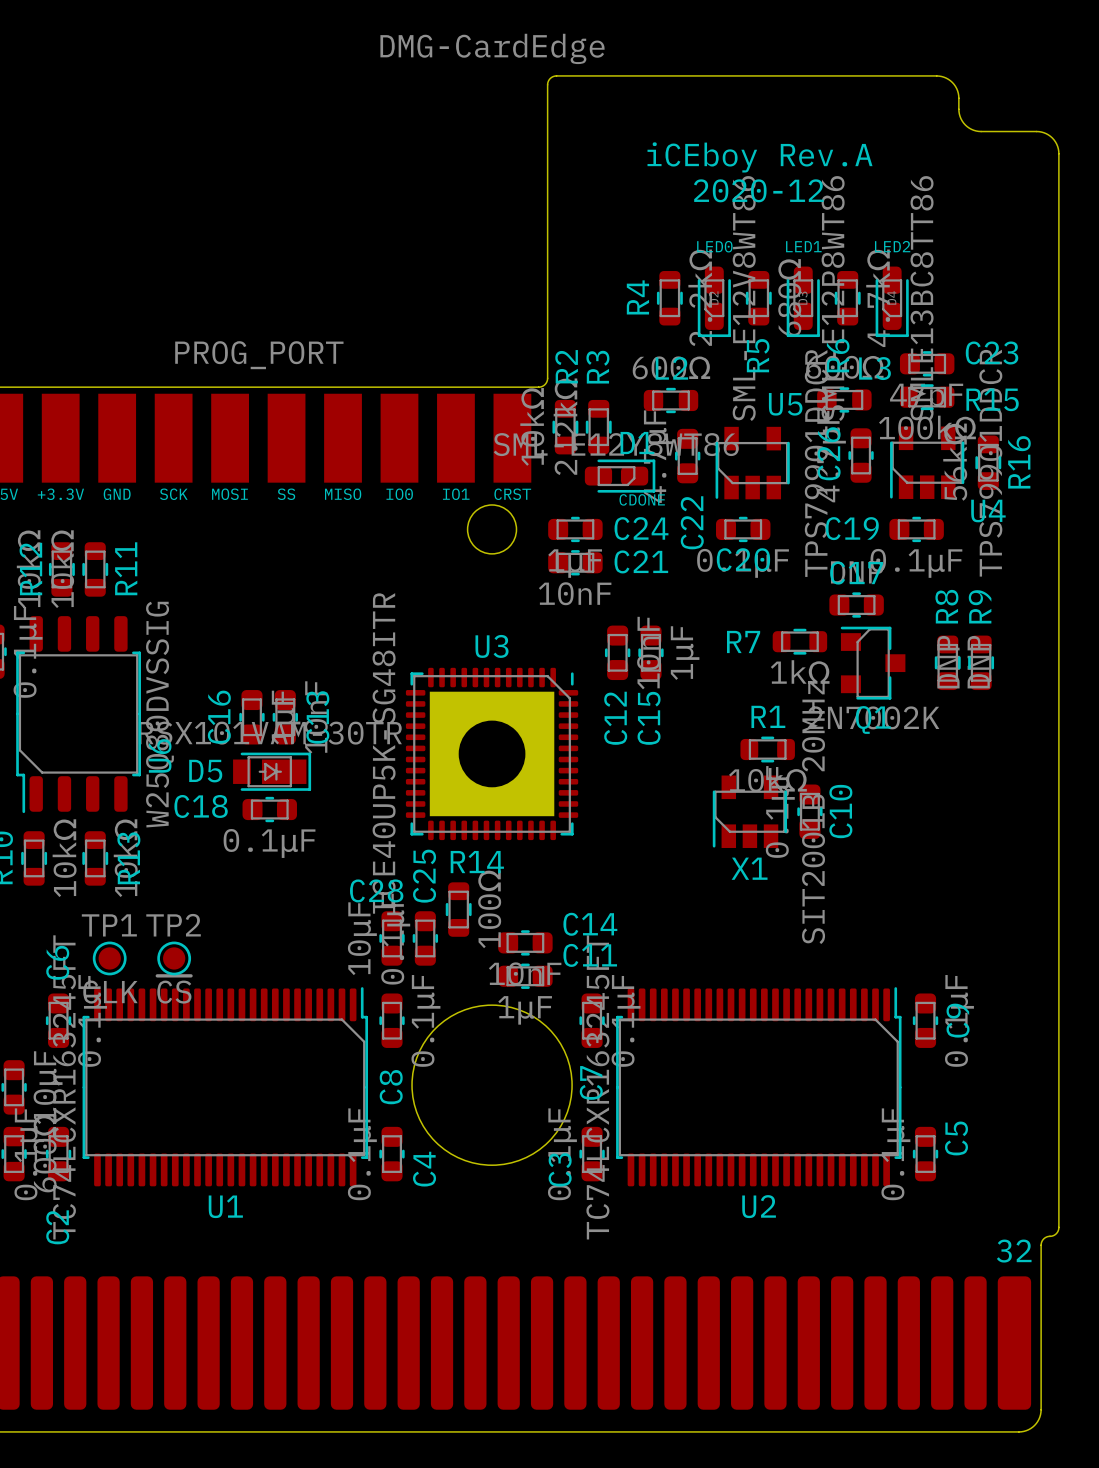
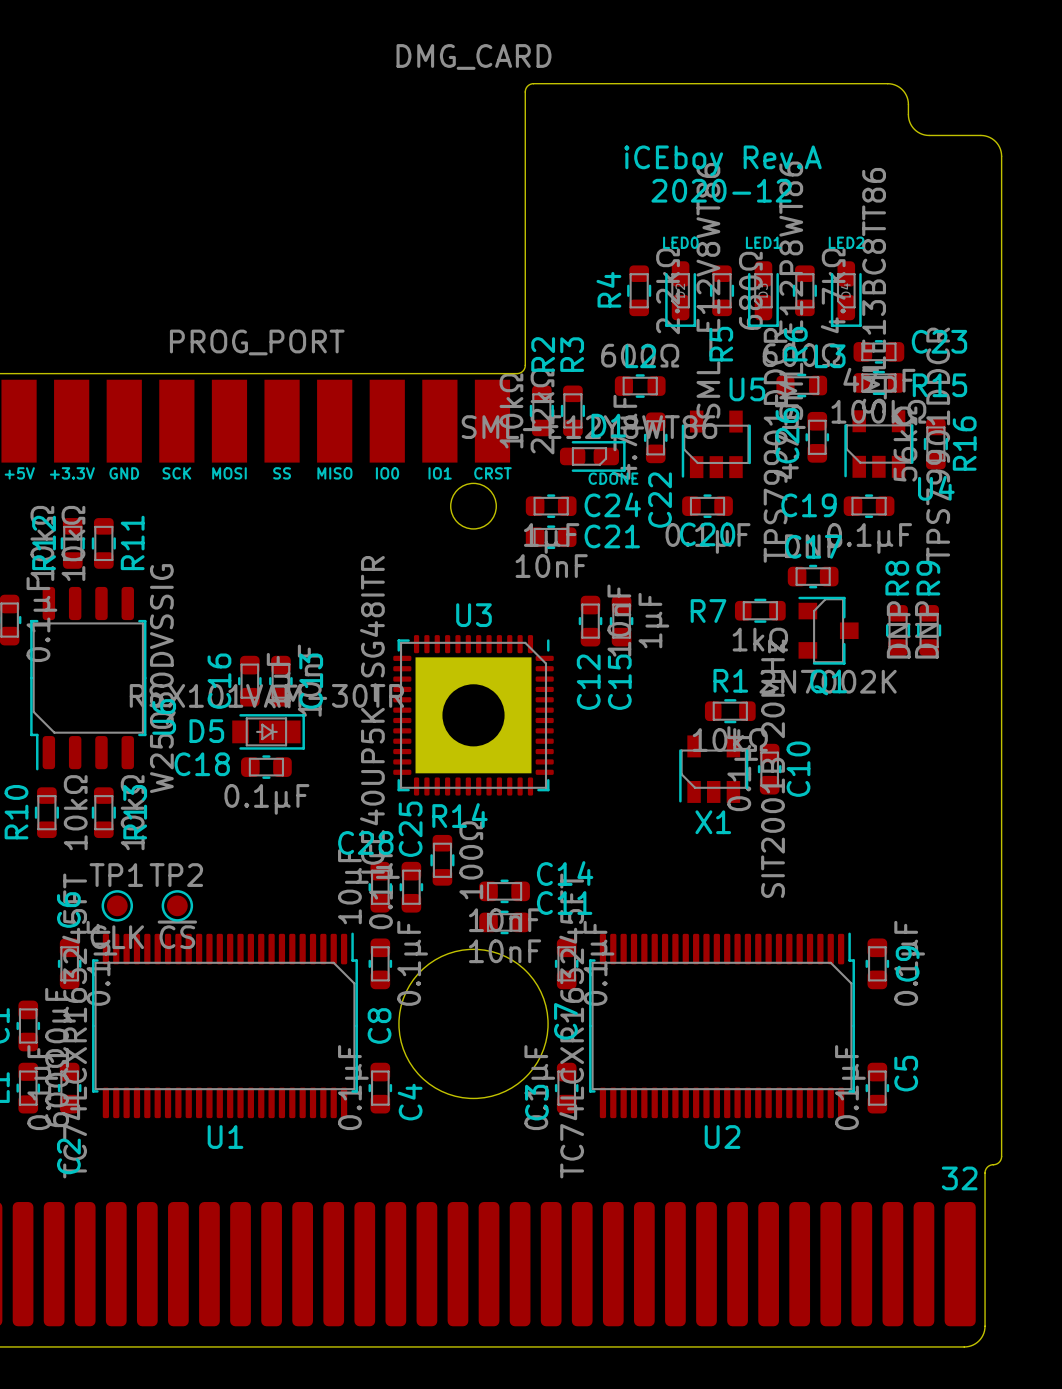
part value: DMG-CardEdge (492, 48) -> DMG_CARD (474, 56)
C11 value: 1μF (525, 1010) -> 10nF (505, 951)

